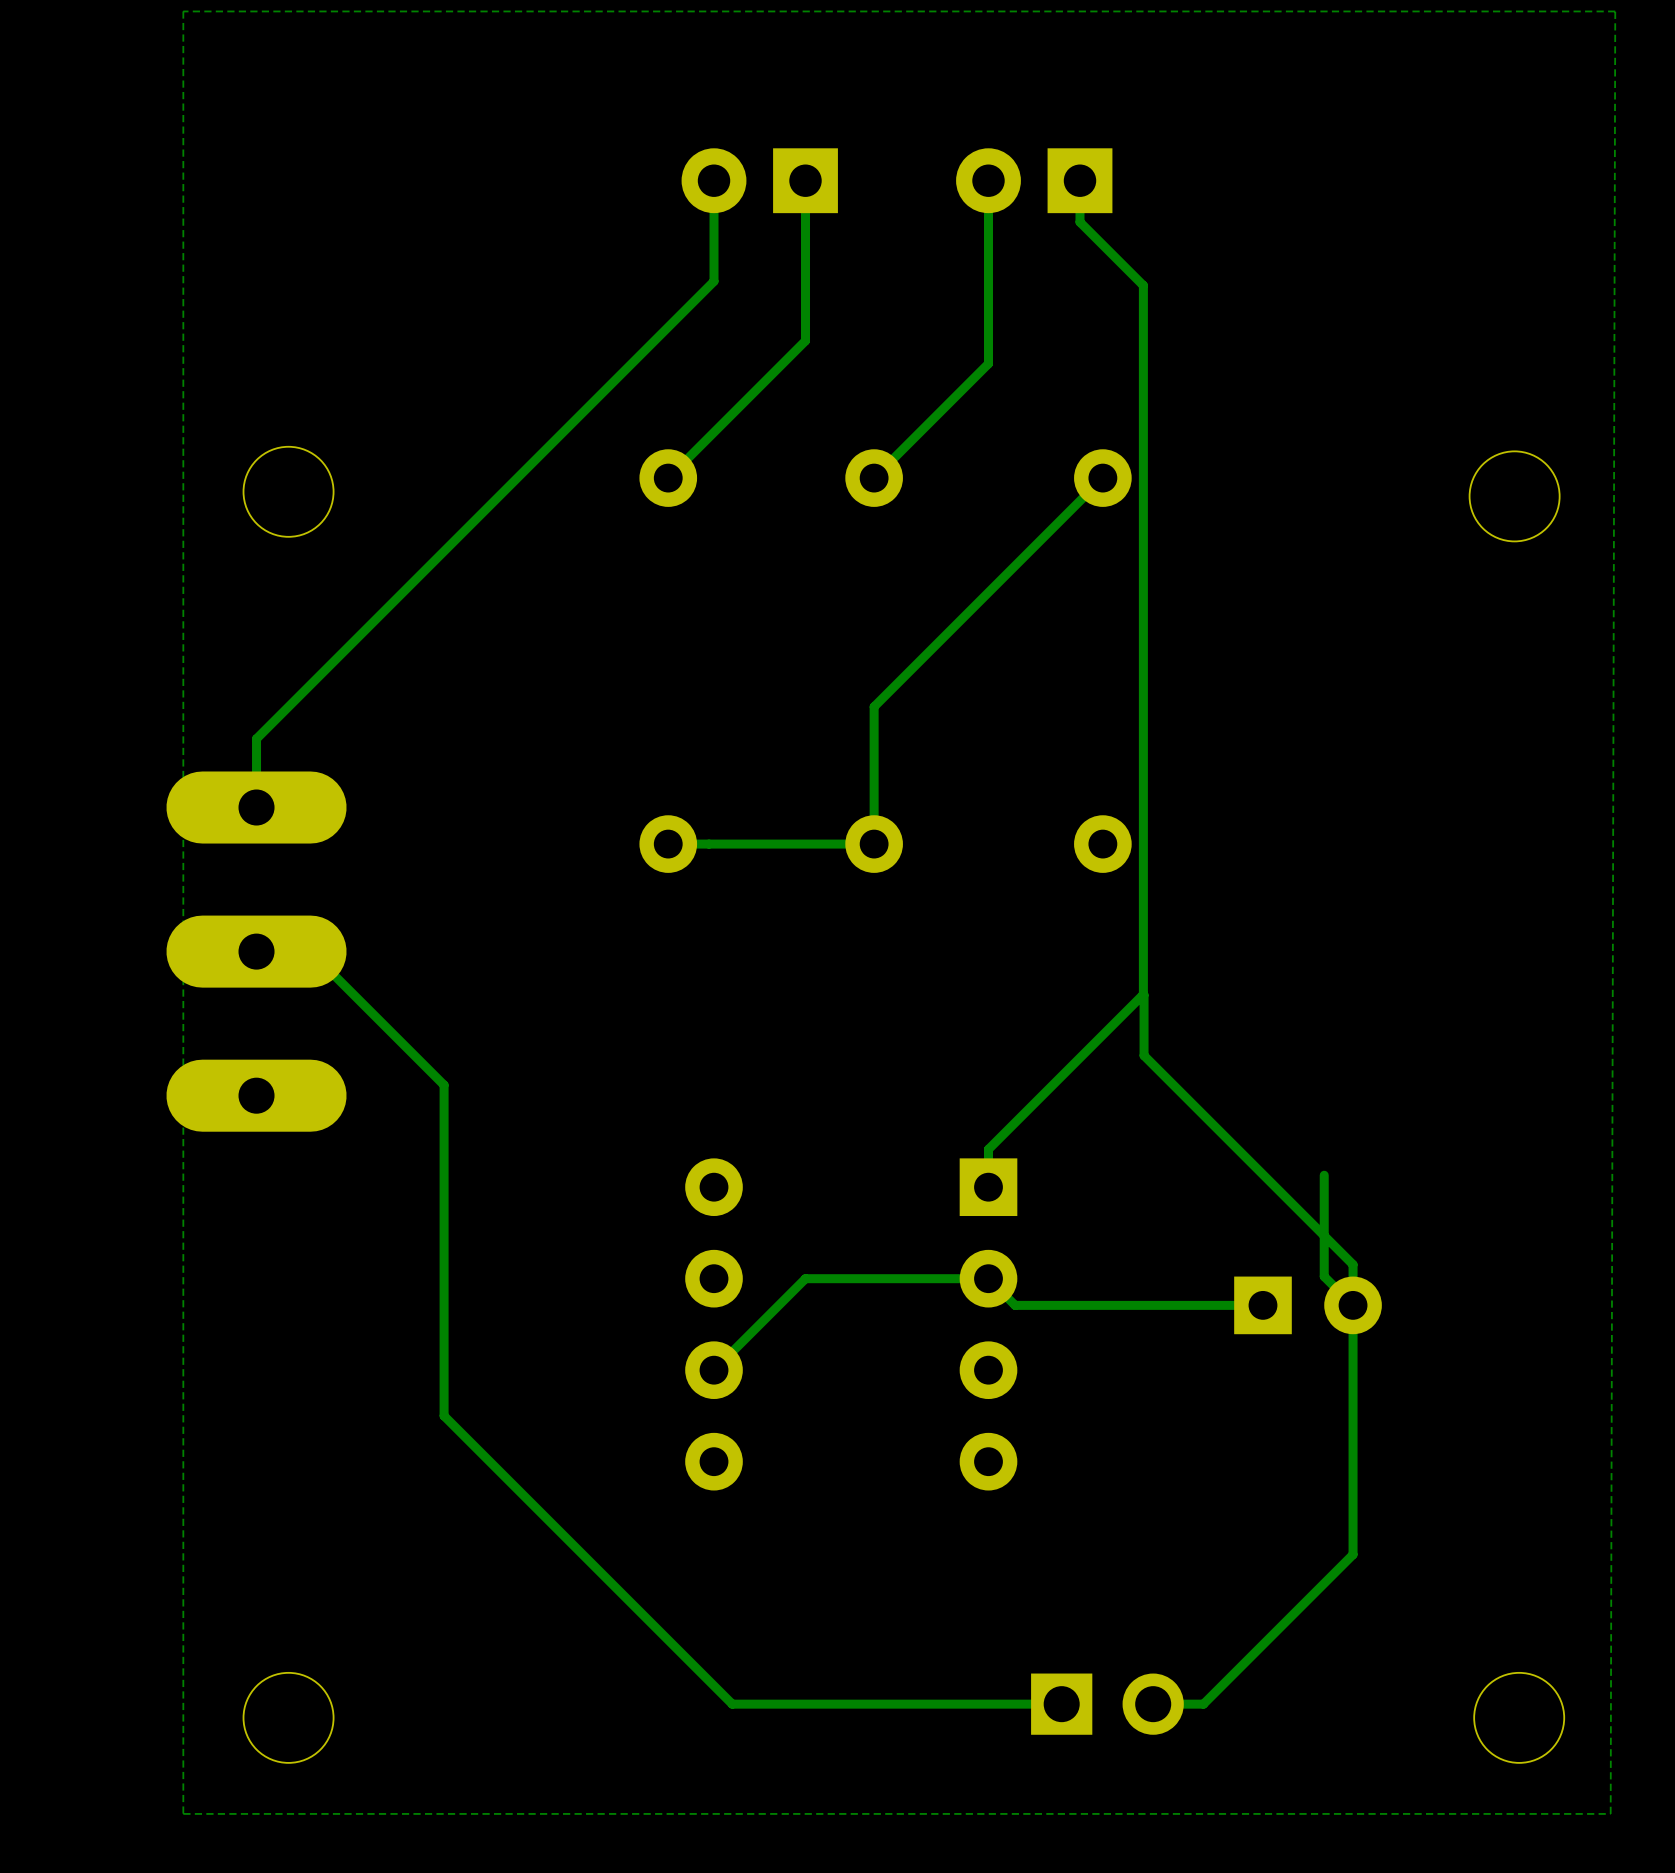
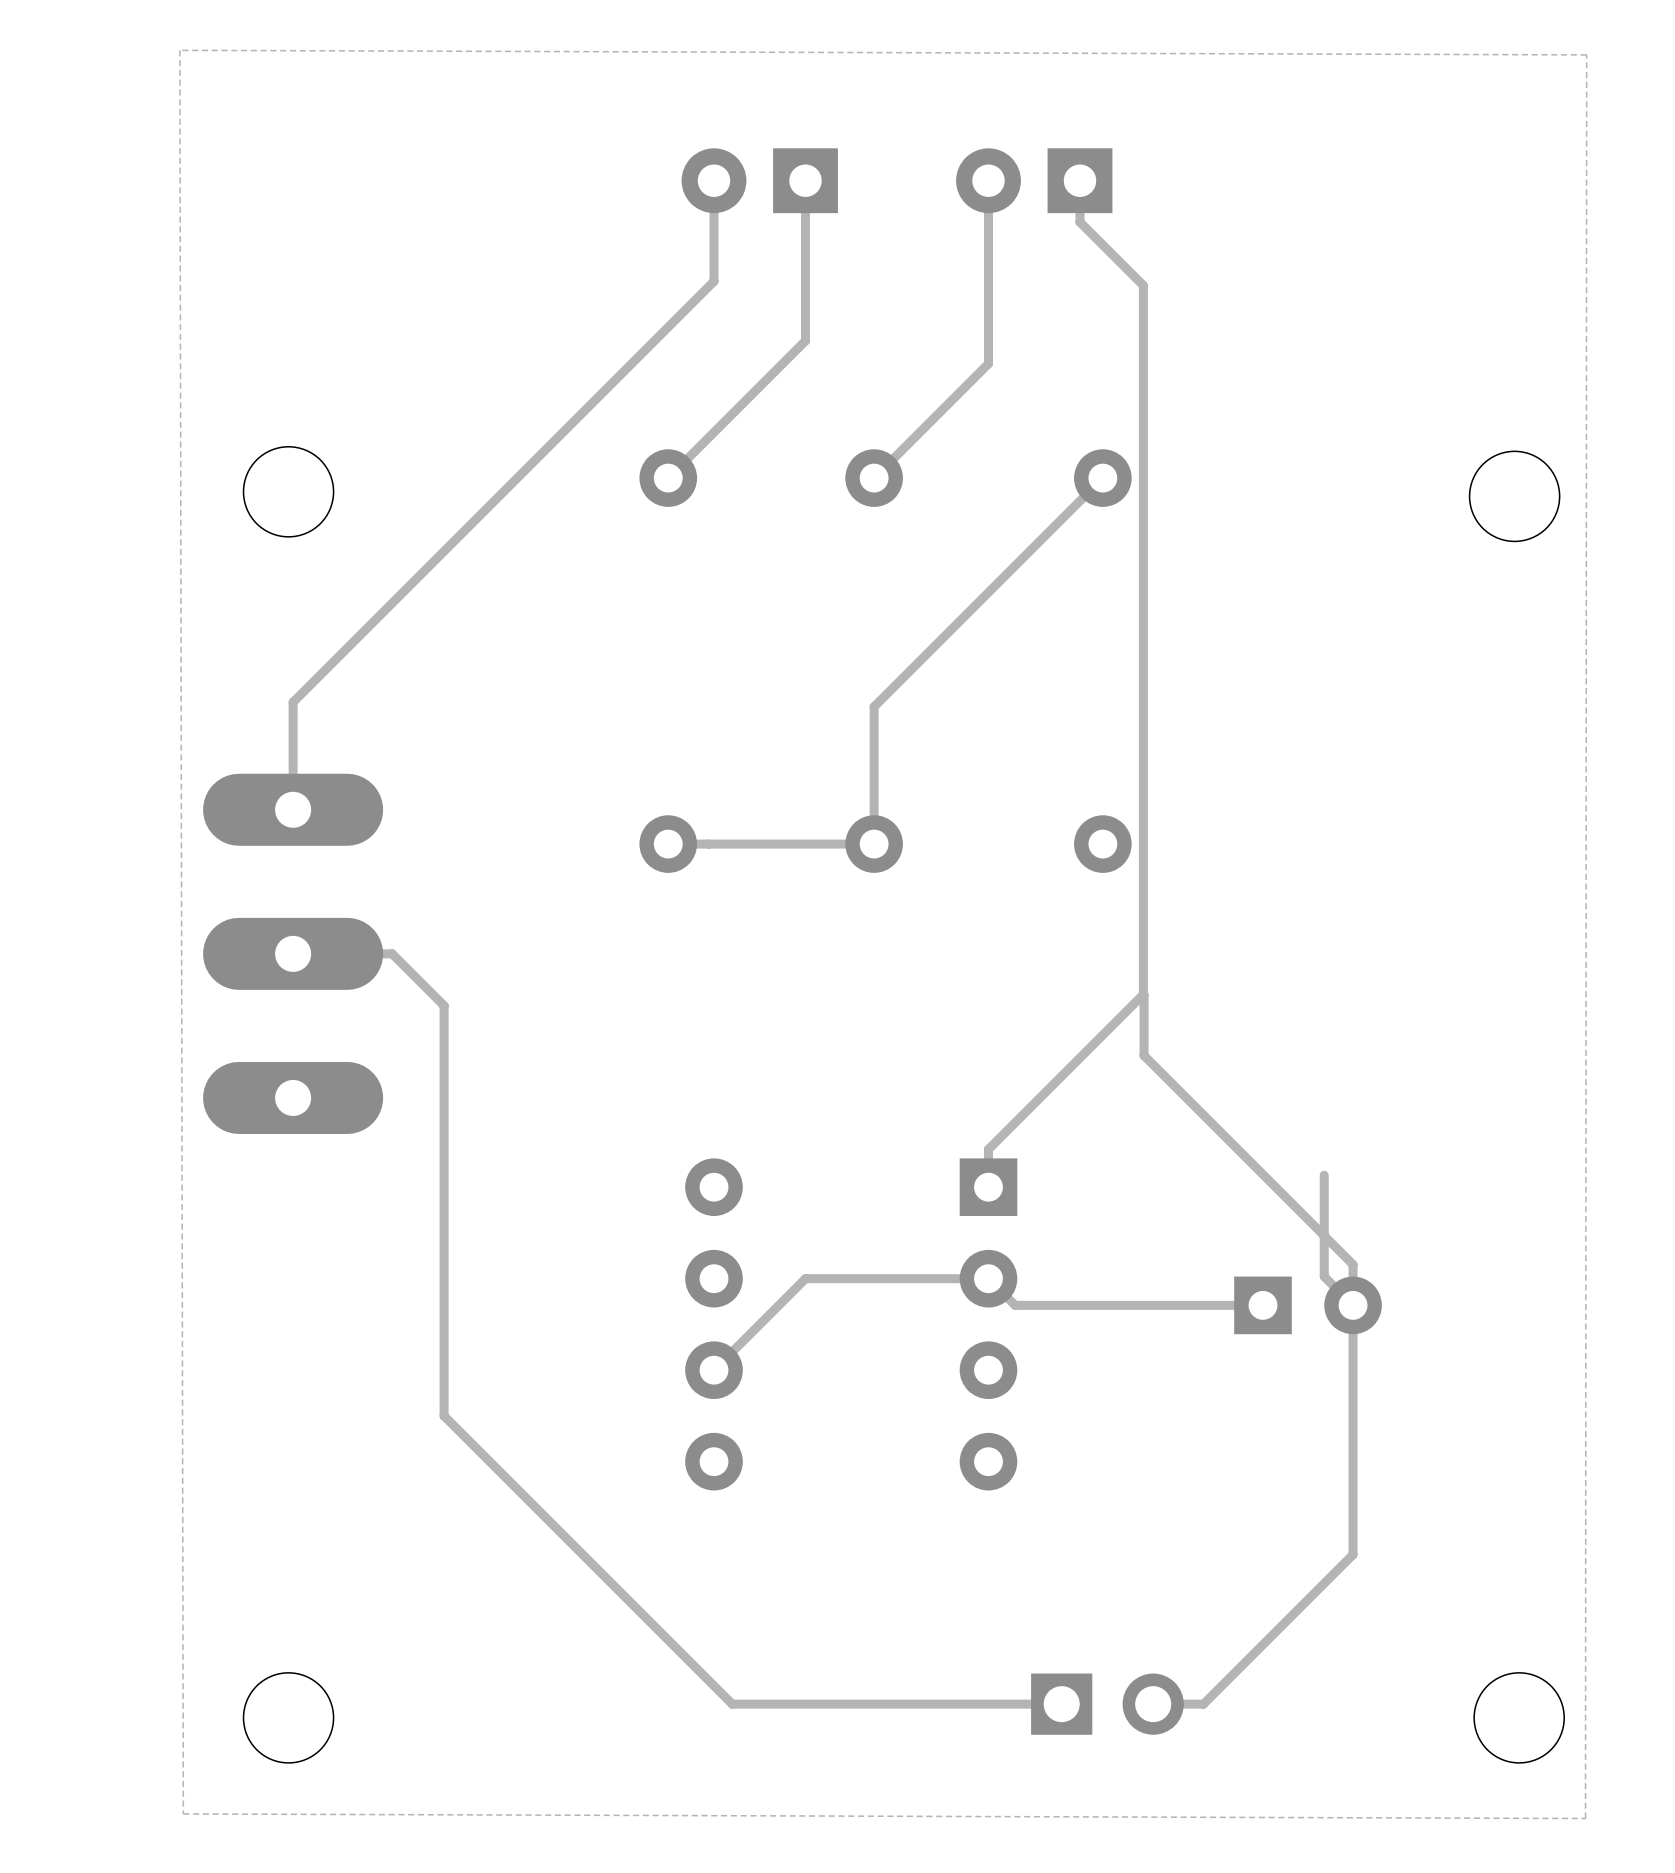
zone outline: (1615, 11) (183, 11) (183, 1813) (1610, 1813) (1615, 11) -> (179, 50) (1586, 54) (1585, 1818) (183, 1813) (179, 50)
track: (293, 702) (256, 738) (256, 807) -> (293, 702) (293, 809)
part position: (256, 951) -> (293, 953)
track: (310, 951) (444, 1085) -> (293, 953) (392, 953) (444, 1005) (444, 1085)

